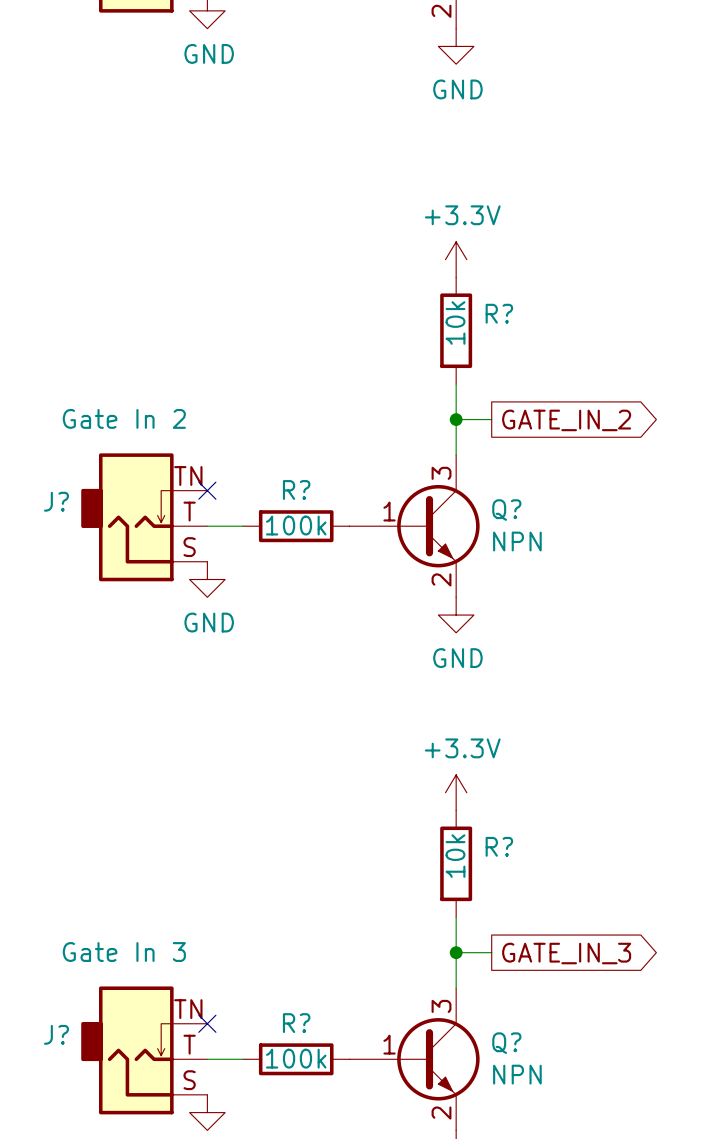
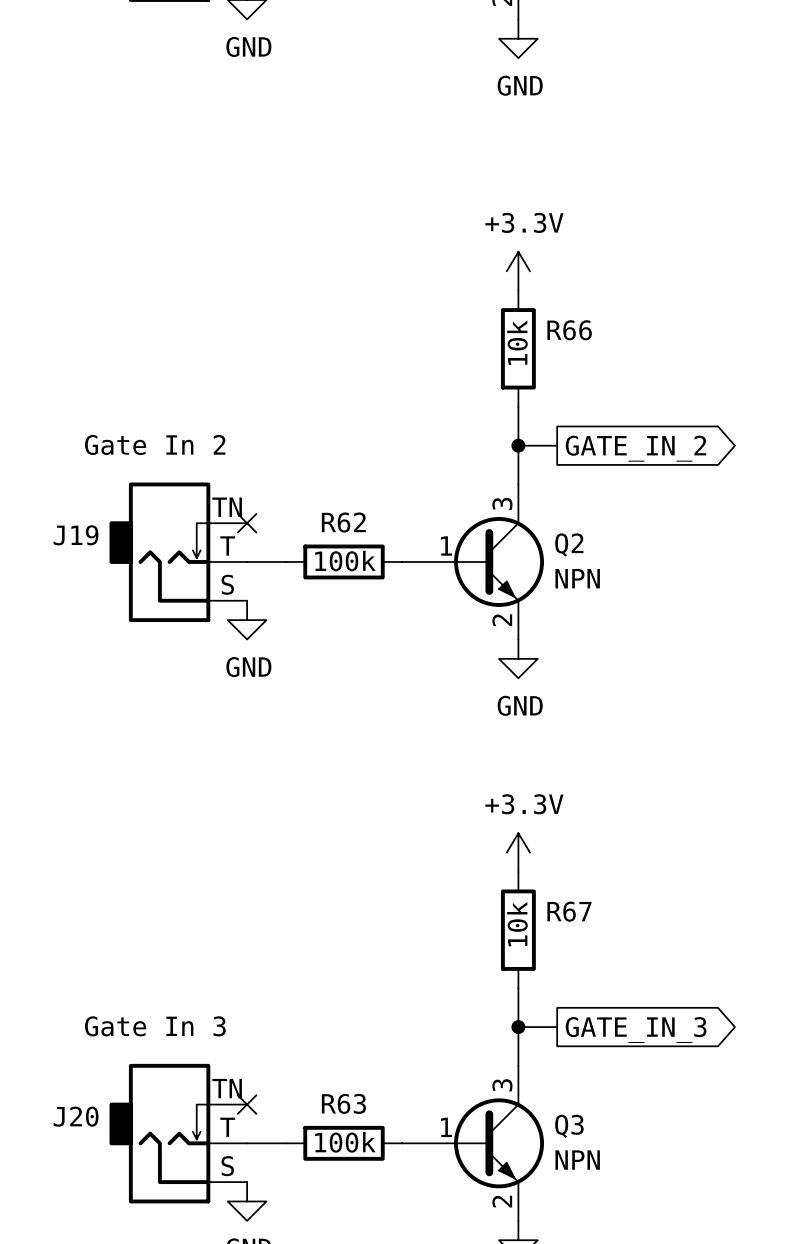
R? name: R? (499, 313) -> R66 (569, 330)
R? name: R? (296, 490) -> R62 (343, 522)
J? name: J? (56, 501) -> J19 (76, 535)
Q? name: Q? (506, 510) -> Q2 (569, 545)
R? name: R? (499, 846) -> R67 (569, 911)
R? name: R? (296, 1023) -> R63 (343, 1103)
J? name: J? (56, 1034) -> J20 (76, 1116)
Q? name: Q? (506, 1043) -> Q3 (569, 1126)

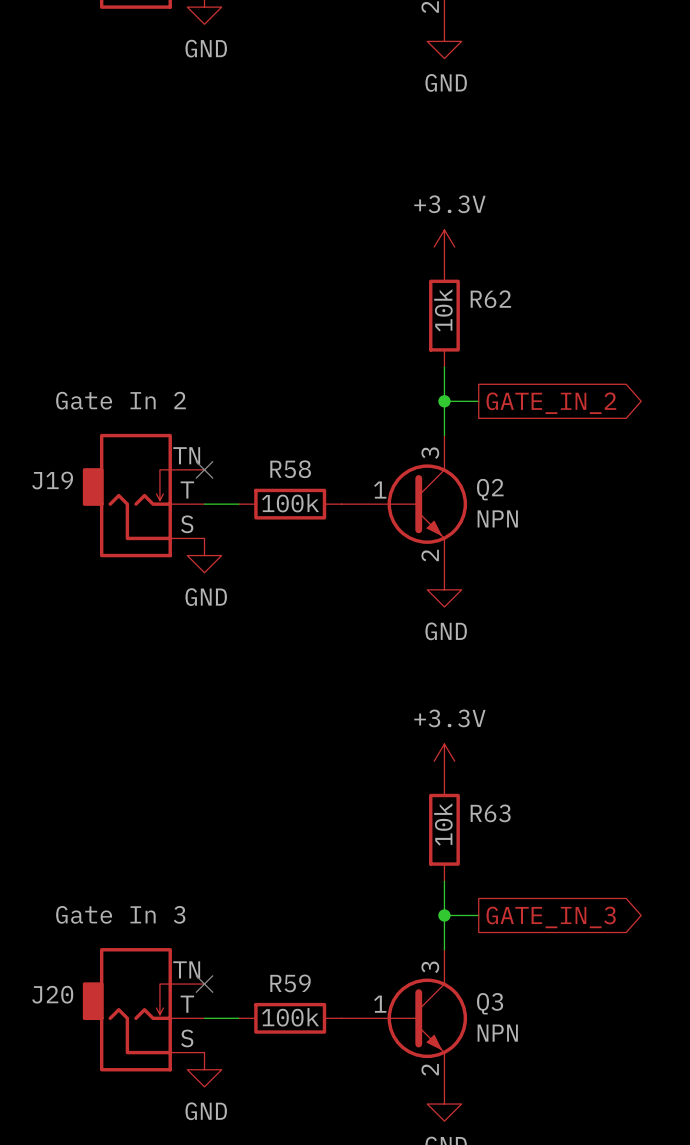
R66 name: R66 (569, 330) -> R62 (490, 299)
R62 name: R62 (343, 522) -> R58 (290, 469)
R67 name: R67 (569, 911) -> R63 (490, 813)
R63 name: R63 (343, 1103) -> R59 (290, 983)

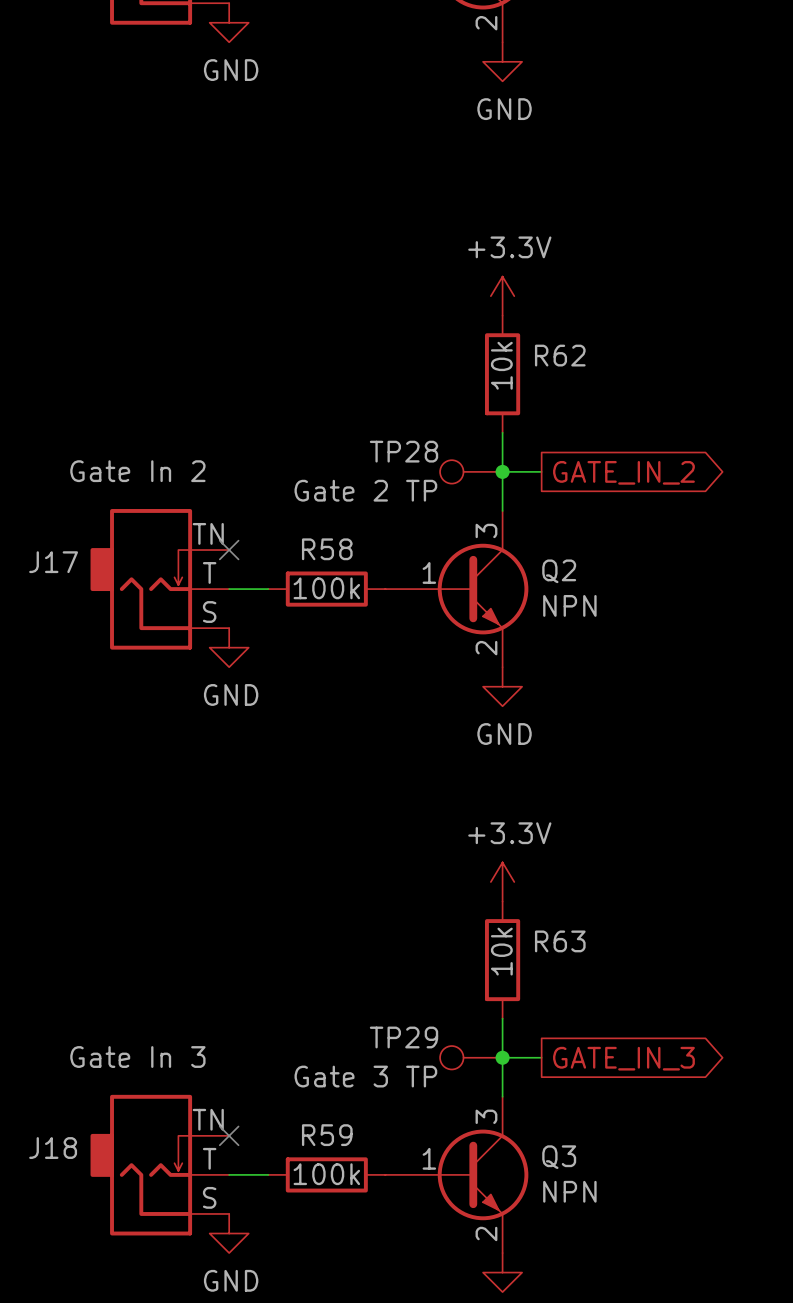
TP28: none -> Gate 2 TP (471, 471)
J19 name: J19 (52, 480) -> J17 (53, 562)
TP29: none -> Gate 3 TP (471, 1057)
J20 name: J20 (52, 994) -> J18 (53, 1148)

